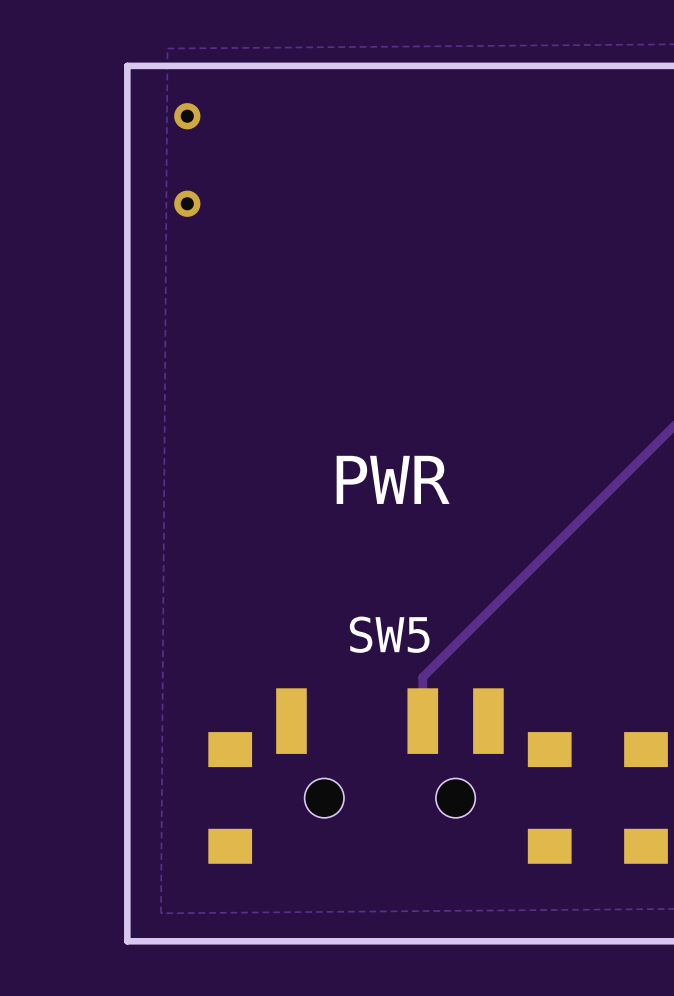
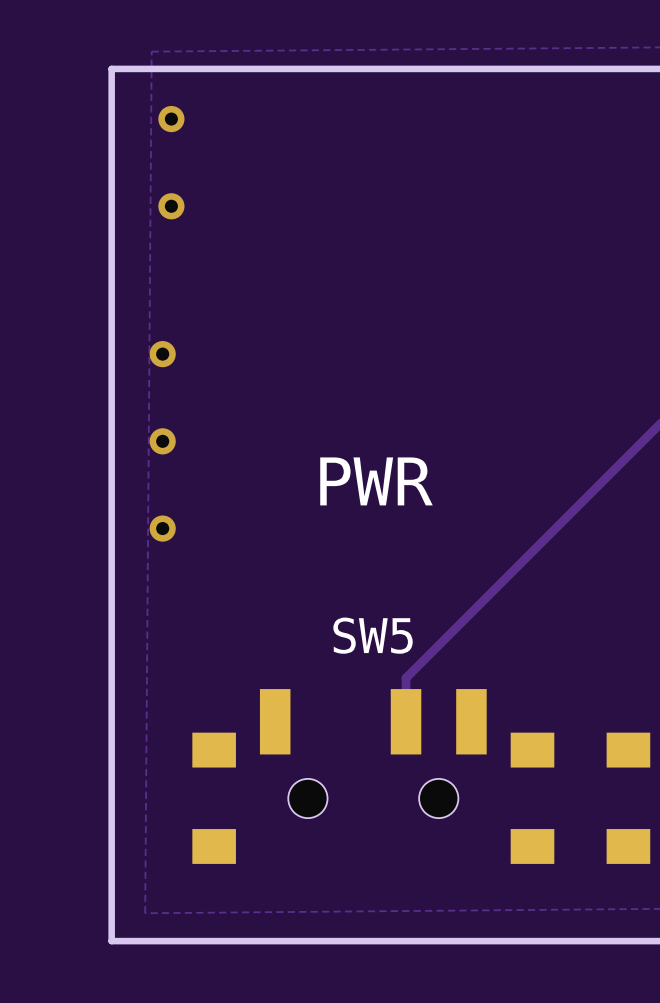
via: none -> (162, 354)
via: none -> (162, 441)
via: none -> (162, 528)

